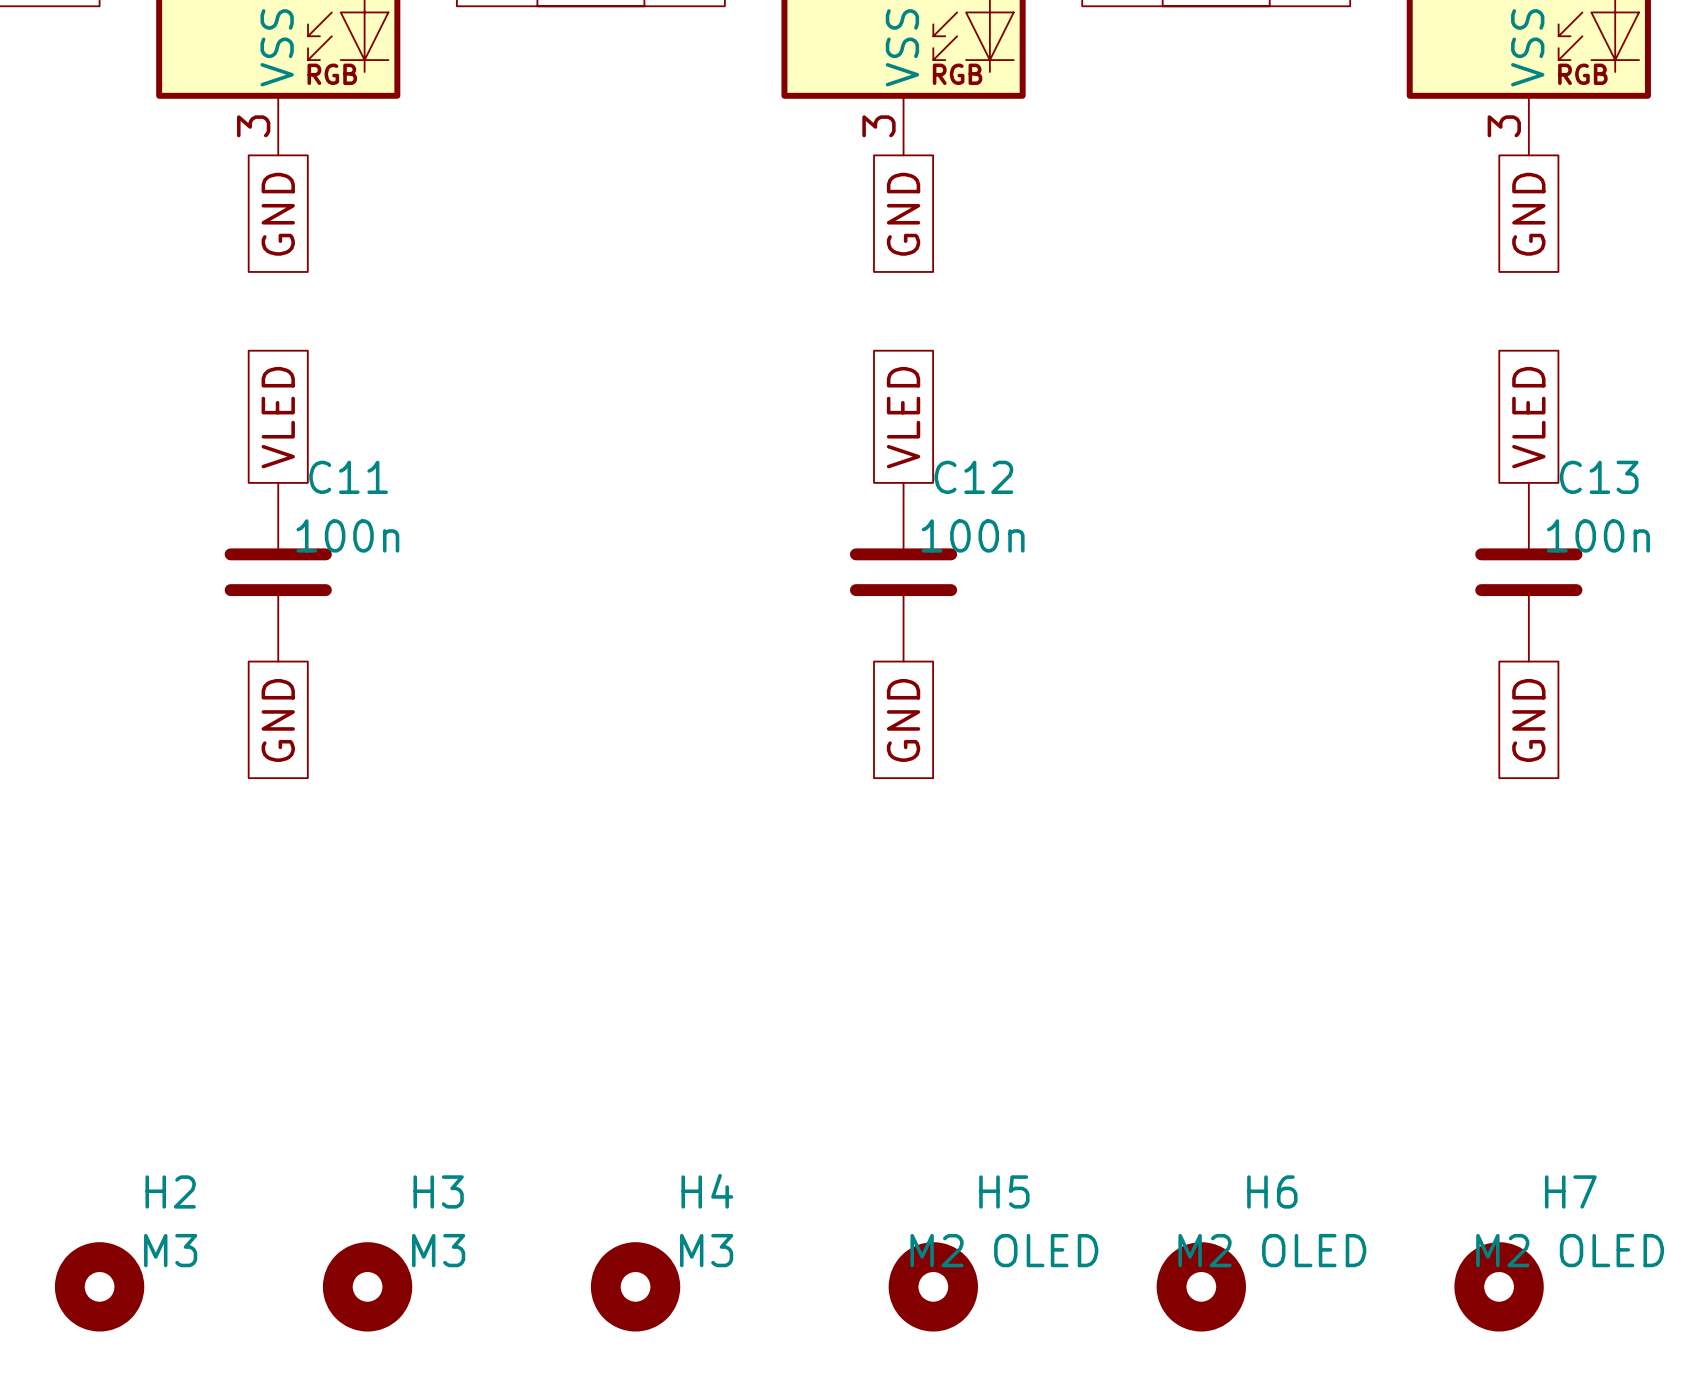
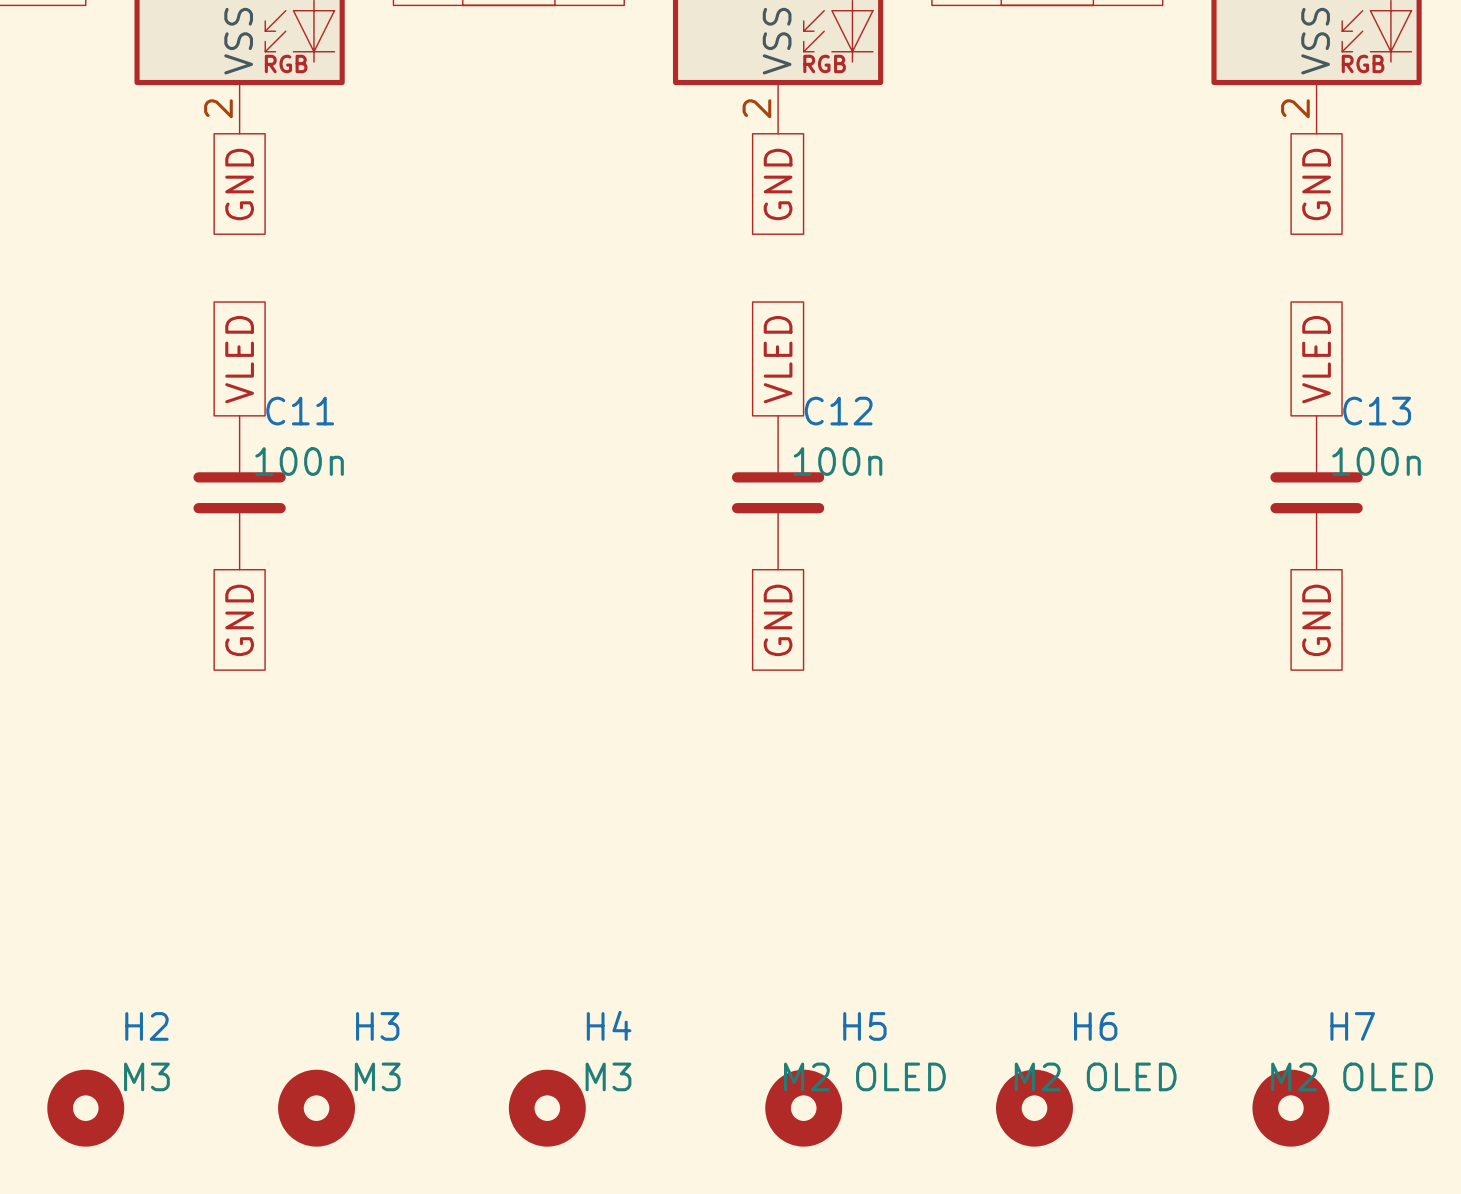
part pin number: 3 (253, 126) -> 2 (218, 108)
part pin number: 3 (878, 126) -> 2 (756, 108)
part pin number: 3 (1504, 126) -> 2 (1295, 108)

